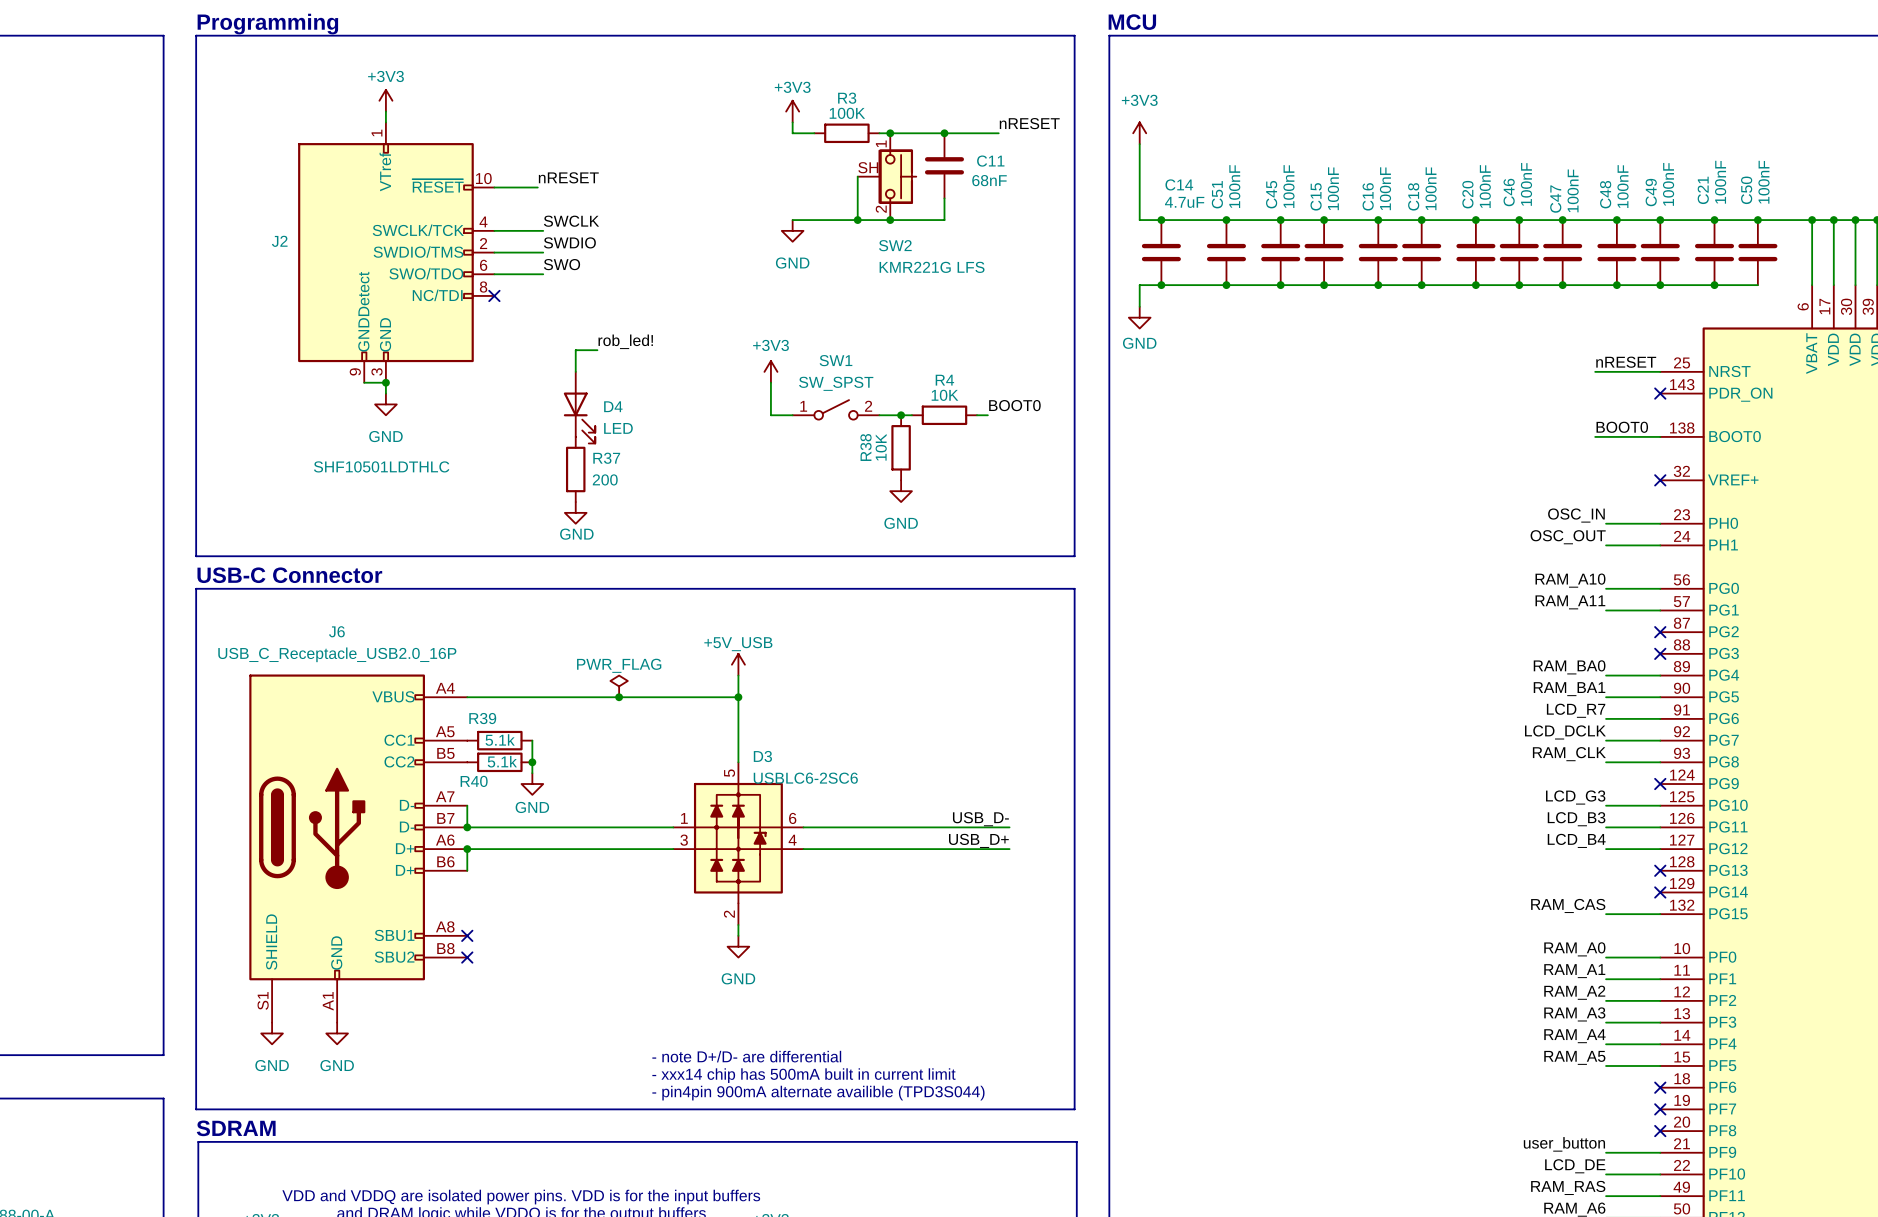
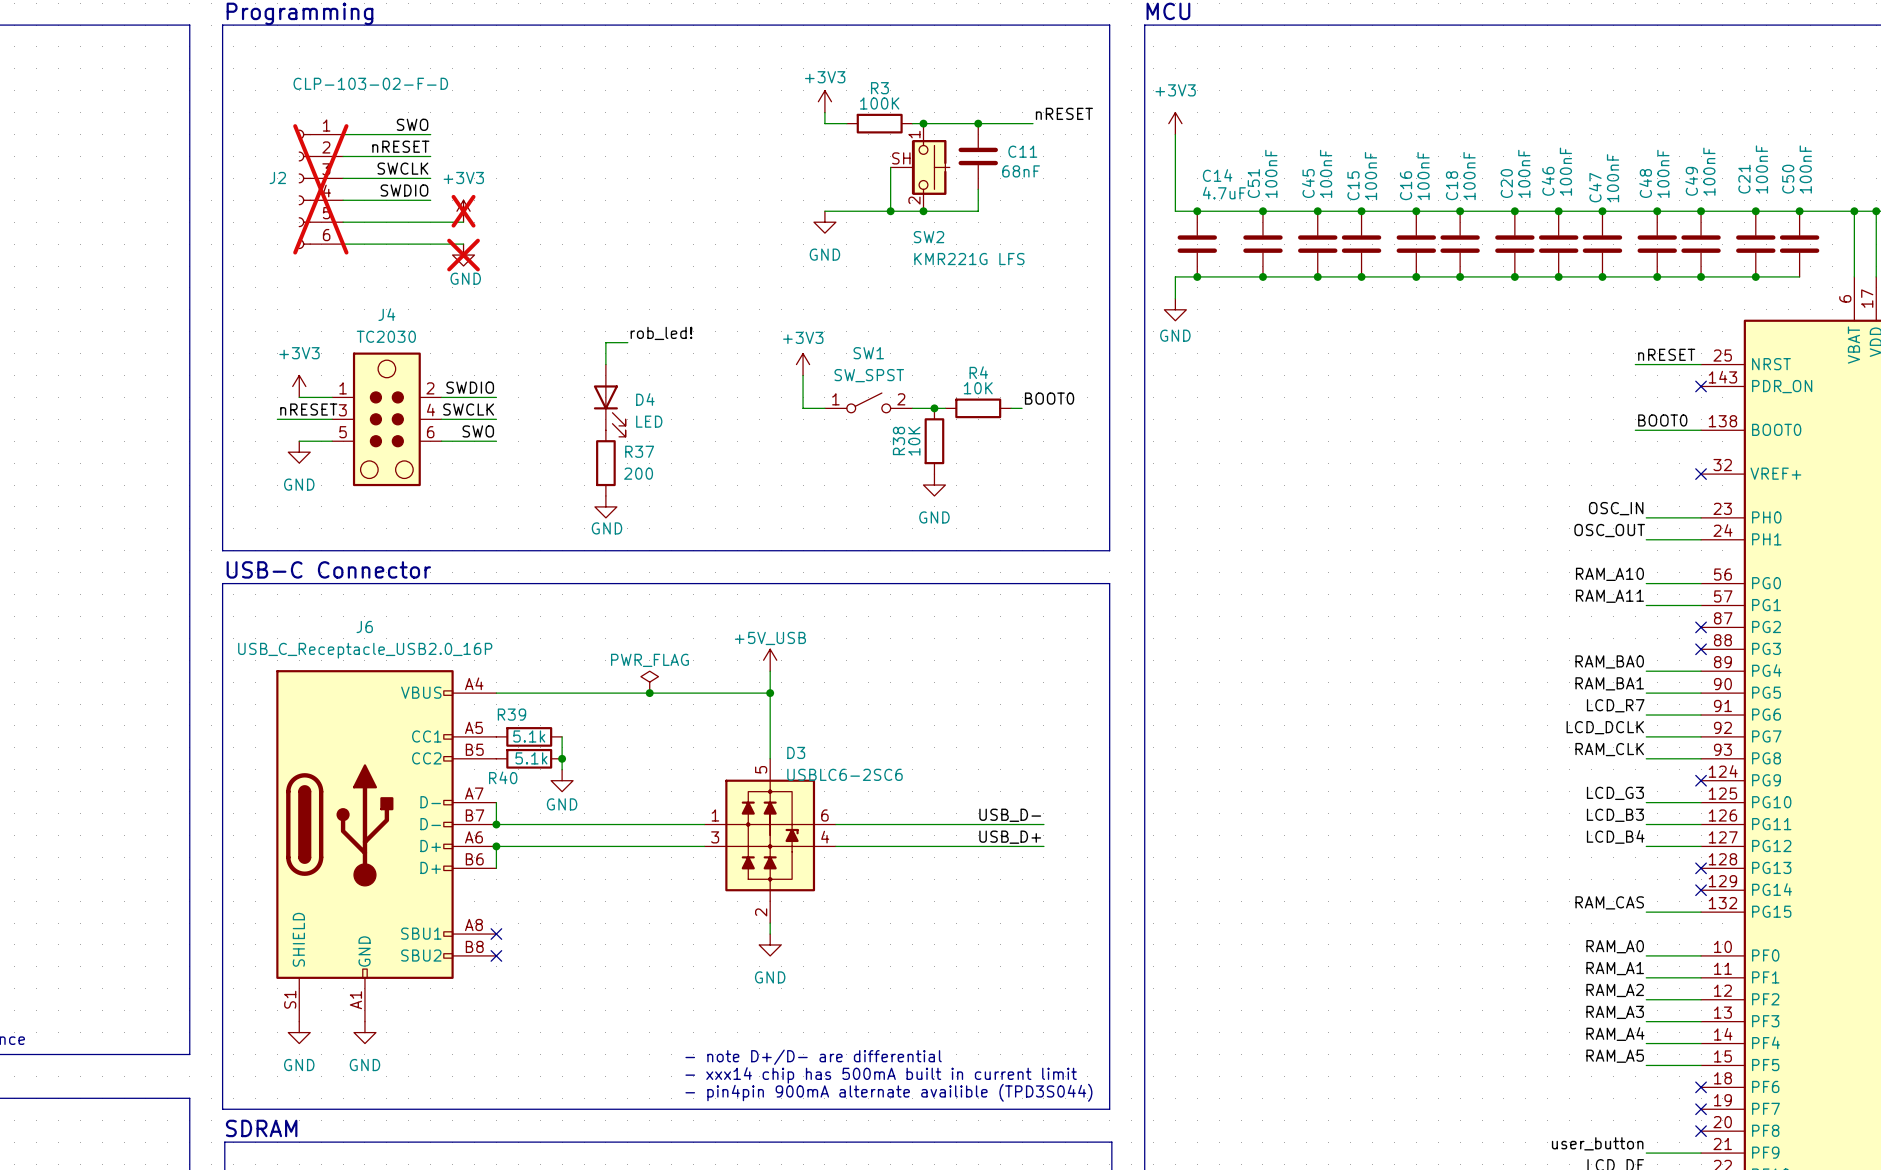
power symbol text position: +3V3 (385, 76) -> +3V3 (463, 177)
power symbol position: +3V3 (385, 100) -> +3V3 (463, 211)
wire: (385, 111) (385, 122) -> none
J2 symbol: [298, 122, 495, 383] -> [298, 129, 344, 250]
label: none -> SWO (412, 124)
label: none -> SWCLK (402, 168)
label position: nRESET (568, 177) -> nRESET (400, 146)
wire: (494, 187) (537, 187) -> none
J2 do-not-place cross: none -> (320, 189)
label: none -> SWDIO (404, 190)
power symbol do-not-place cross: none -> (463, 211)
label: SWCLK (571, 221) -> none
wire: (494, 230) (543, 230) -> none
J2 name position: J2 (279, 241) -> J2 (277, 177)
label: SWDIO (569, 242) -> none
wire: (494, 252) (543, 252) -> none
power symbol: none -> GND (463, 255)
label: SWO (562, 264) -> none
wire: (494, 274) (543, 274) -> none
no-connect mark: (494, 295) -> none
junction: (385, 382) -> none
power symbol: none -> +3V3 (299, 386)
label: none -> SWDIO (470, 387)
wire: none -> (299, 397) (332, 397)
power symbol: GND (385, 404) -> none
wire: none -> (441, 397) (496, 397)
label: none -> nRESET (308, 409)
label: none -> SWCLK (468, 409)
wire: none -> (277, 419) (332, 419)
J4: none -> TC2030 (386, 419)
wire: none -> (441, 419) (496, 419)
label: none -> SWO (478, 431)
wire: none -> (299, 441) (332, 441)
wire: none -> (441, 441) (496, 441)
power symbol: none -> GND (299, 452)
J2 value: SHF10501LDTHLC (381, 466) -> CLP-103-02-F-D (370, 83)

